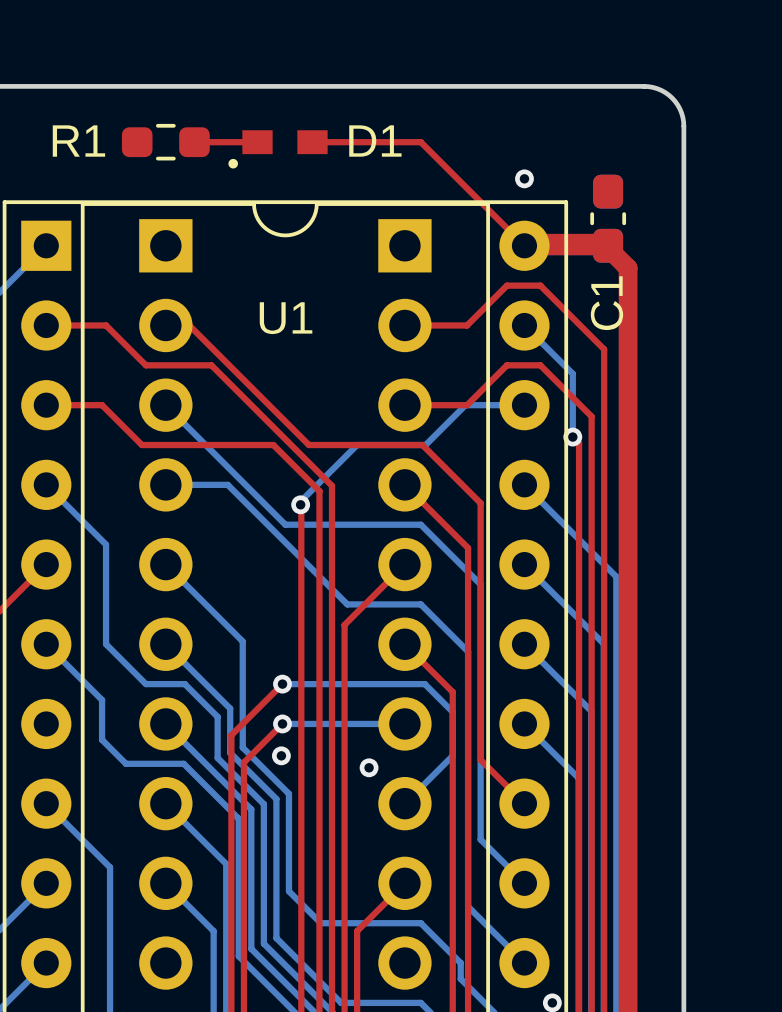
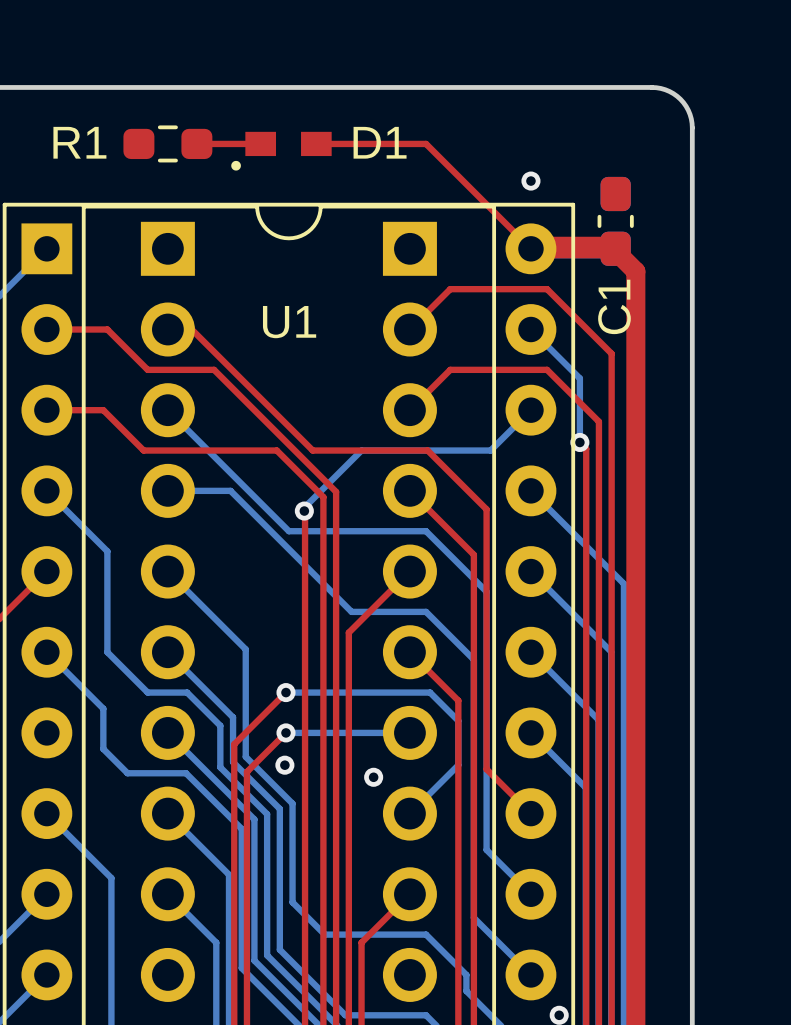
top track: (506, 285) (467, 325) (404, 325) -> (513, 289) (450, 289) (409, 329)
top track: (506, 365) (467, 405) (404, 405) -> (513, 369) (450, 369) (409, 410)
bottom track: (524, 405) (465, 405) (425, 445) -> (530, 410) (490, 450) (430, 450)

